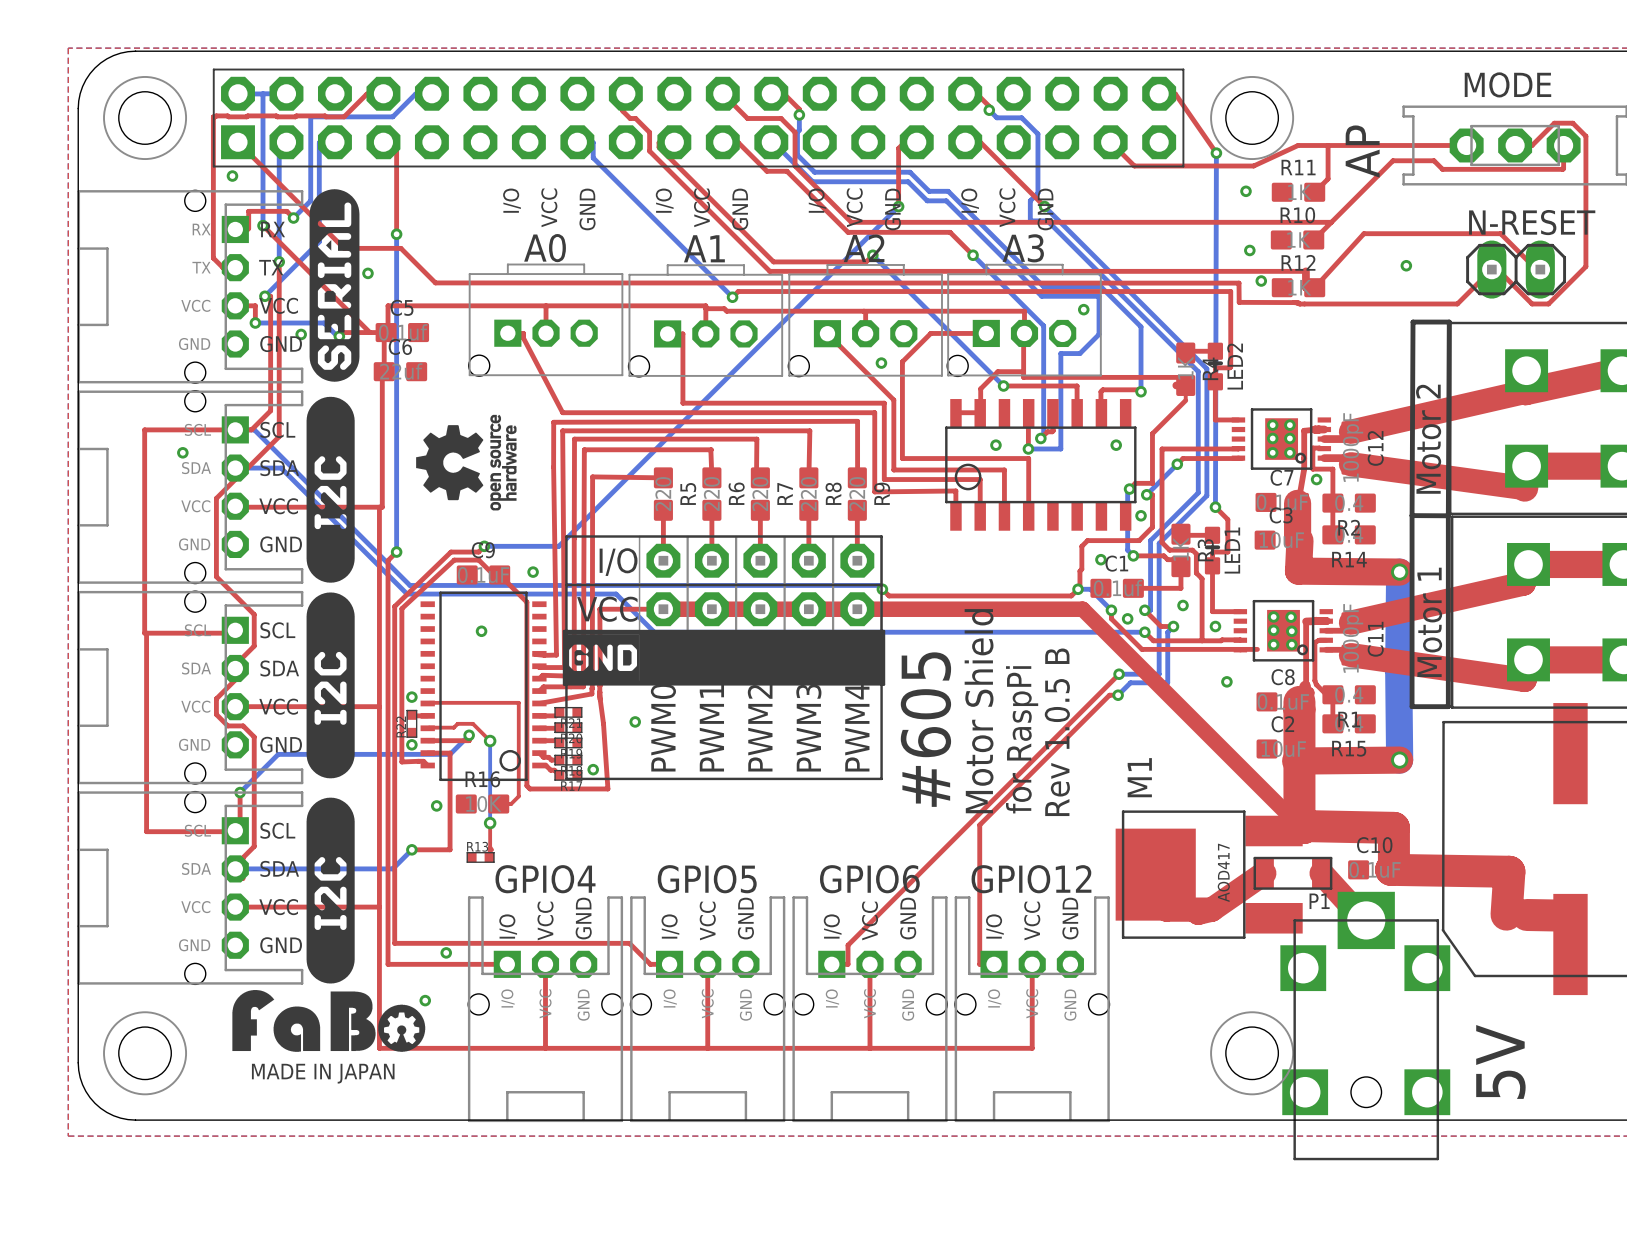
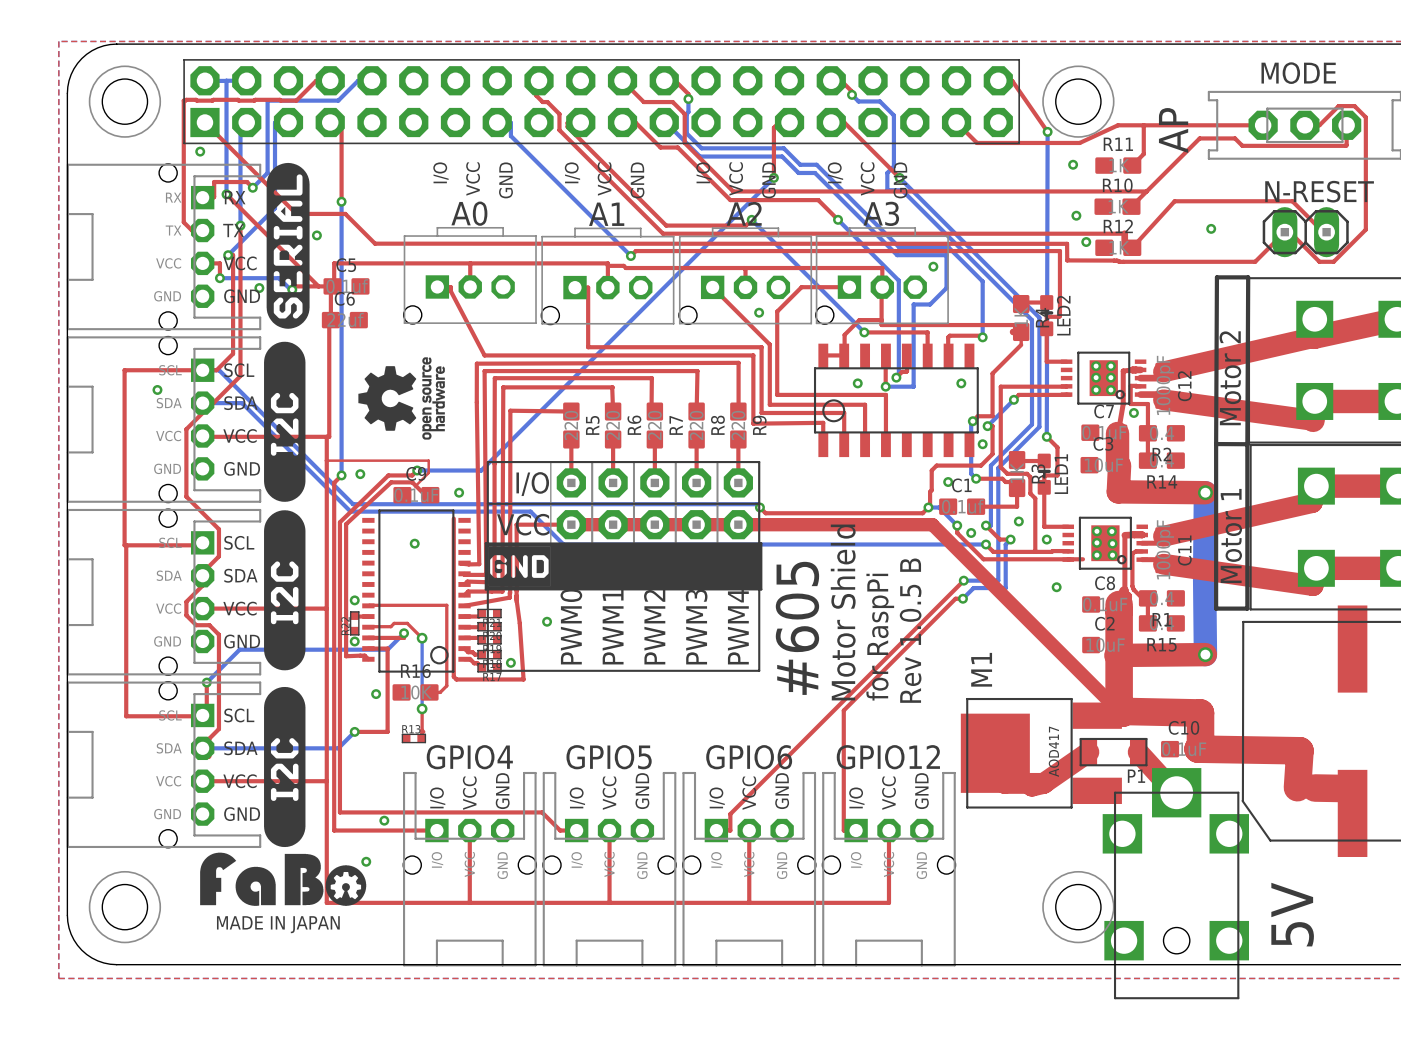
top track: none -> (325, 460) (428, 460) (428, 472) (415, 485)
via: none -> (360, 474)
top track: (499, 574) (526, 602) -> none

